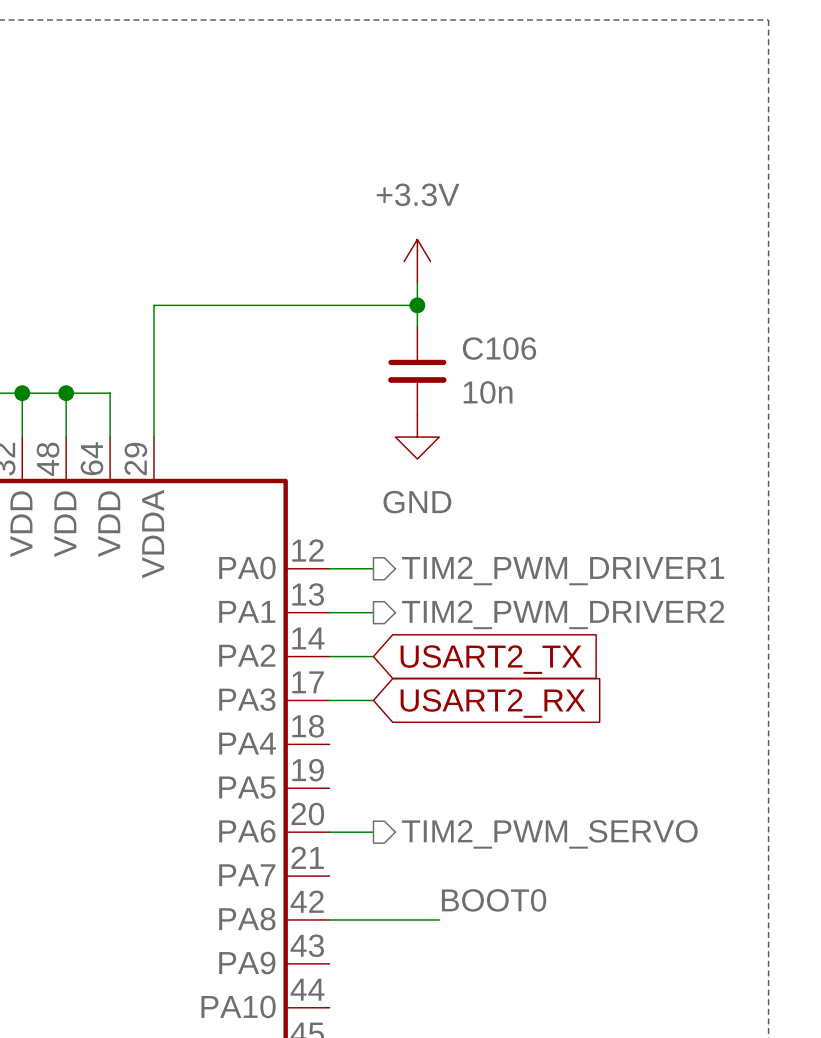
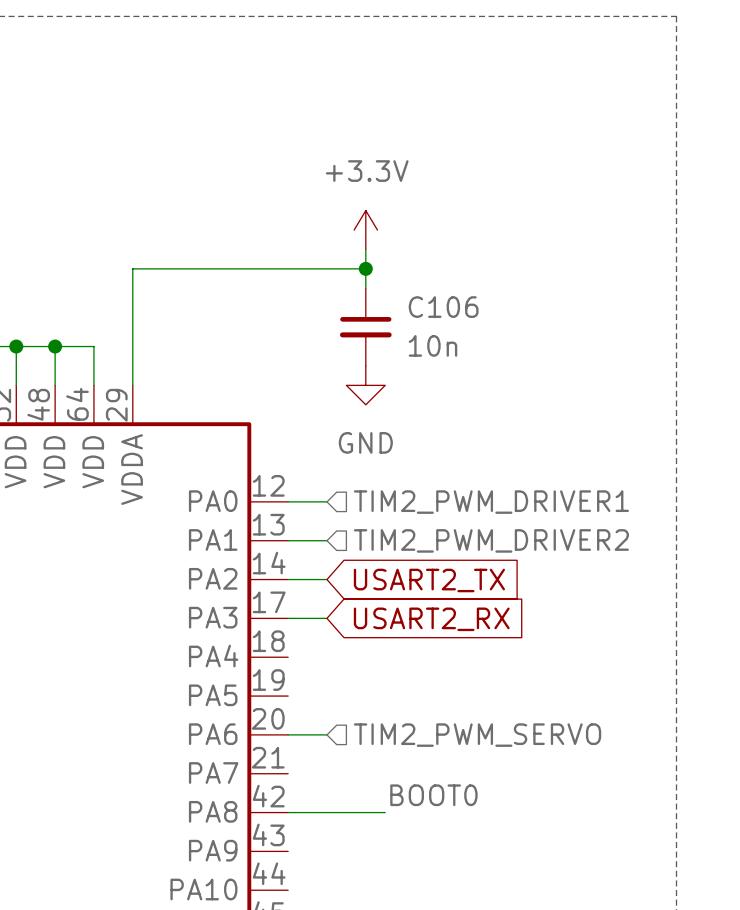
hierarchical label shape: output (563, 570) -> input (491, 502)
hierarchical label shape: output (563, 614) -> input (491, 540)
hierarchical label shape: output (549, 834) -> input (477, 735)

